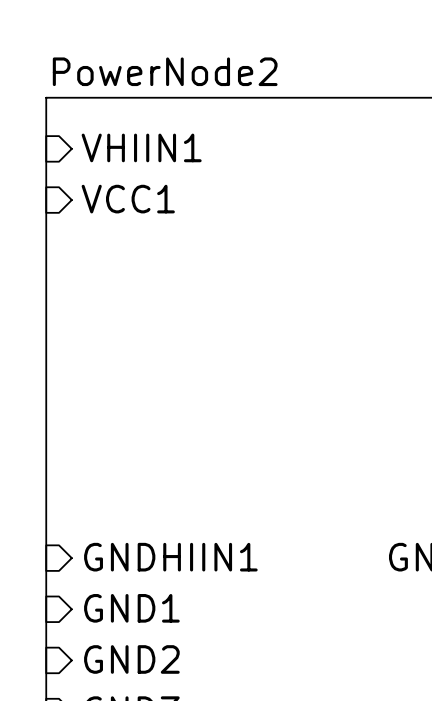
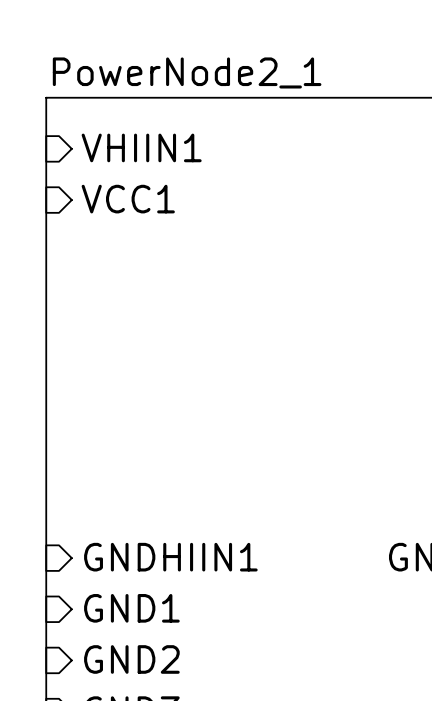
sheet PowerNode2 name: PowerNode2 (165, 71) -> PowerNode2_1 (187, 72)

